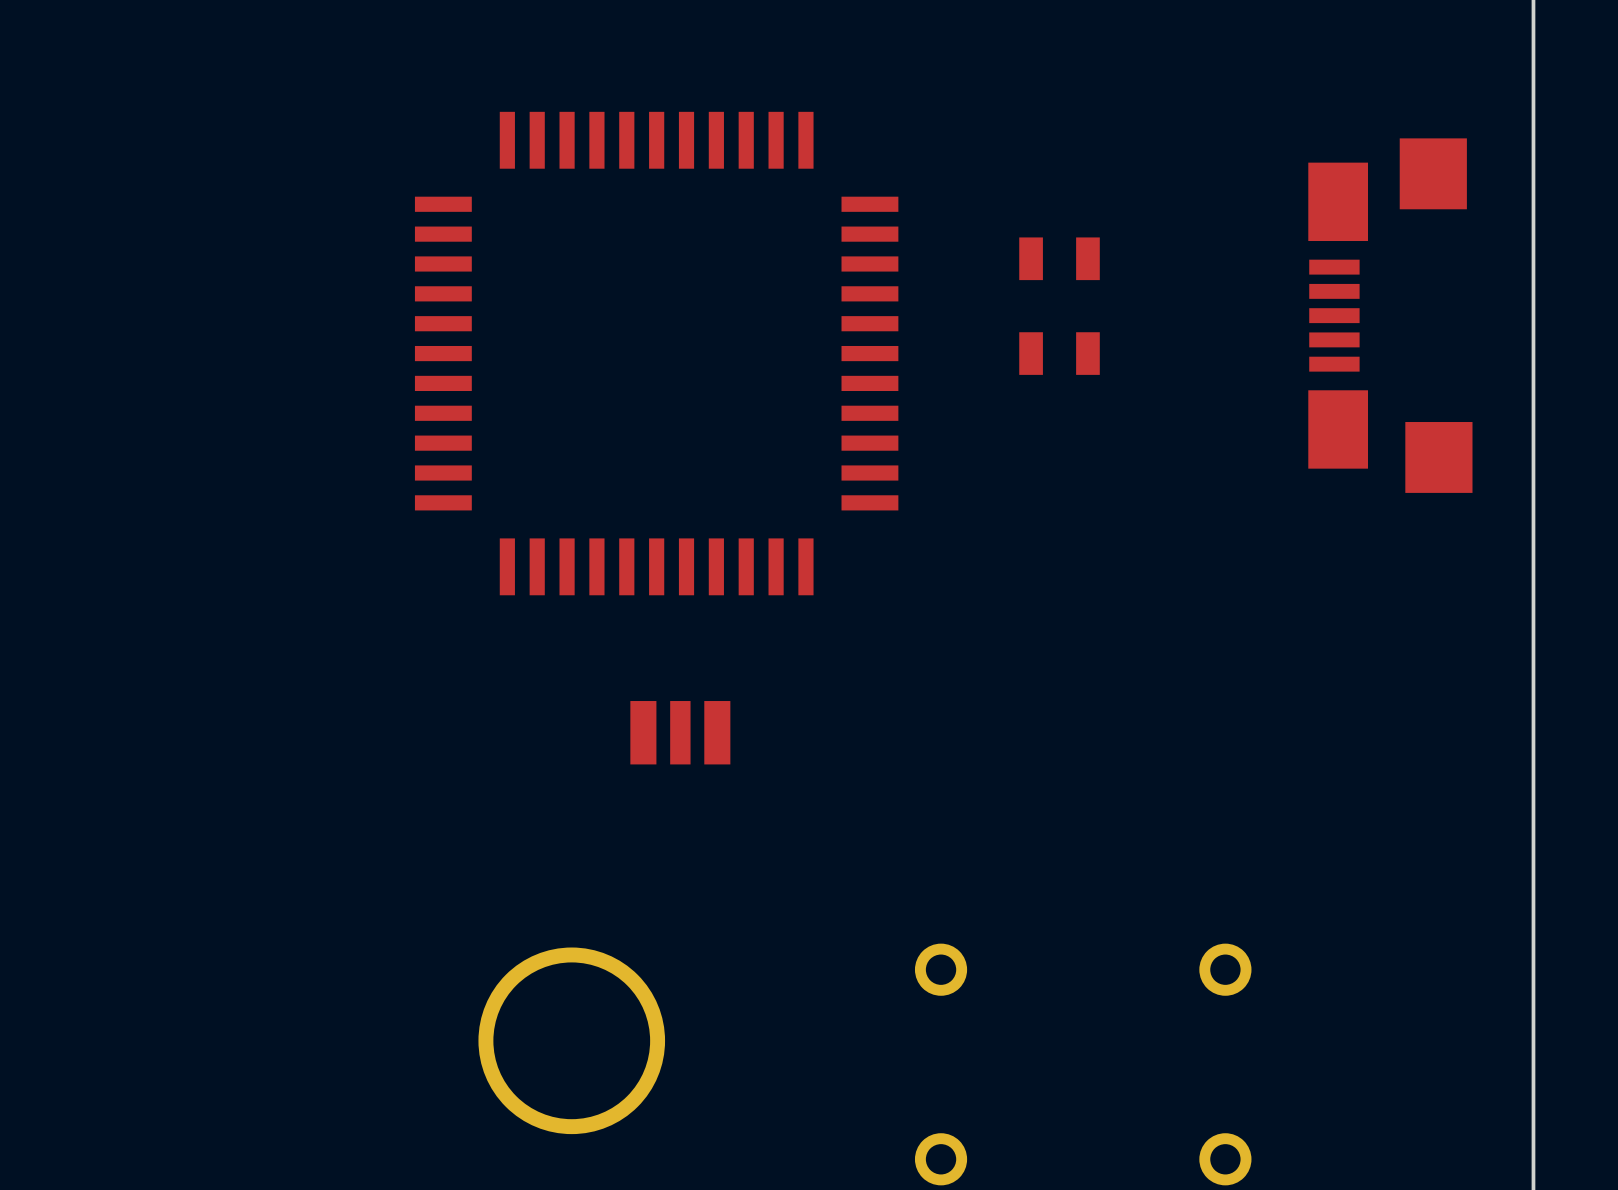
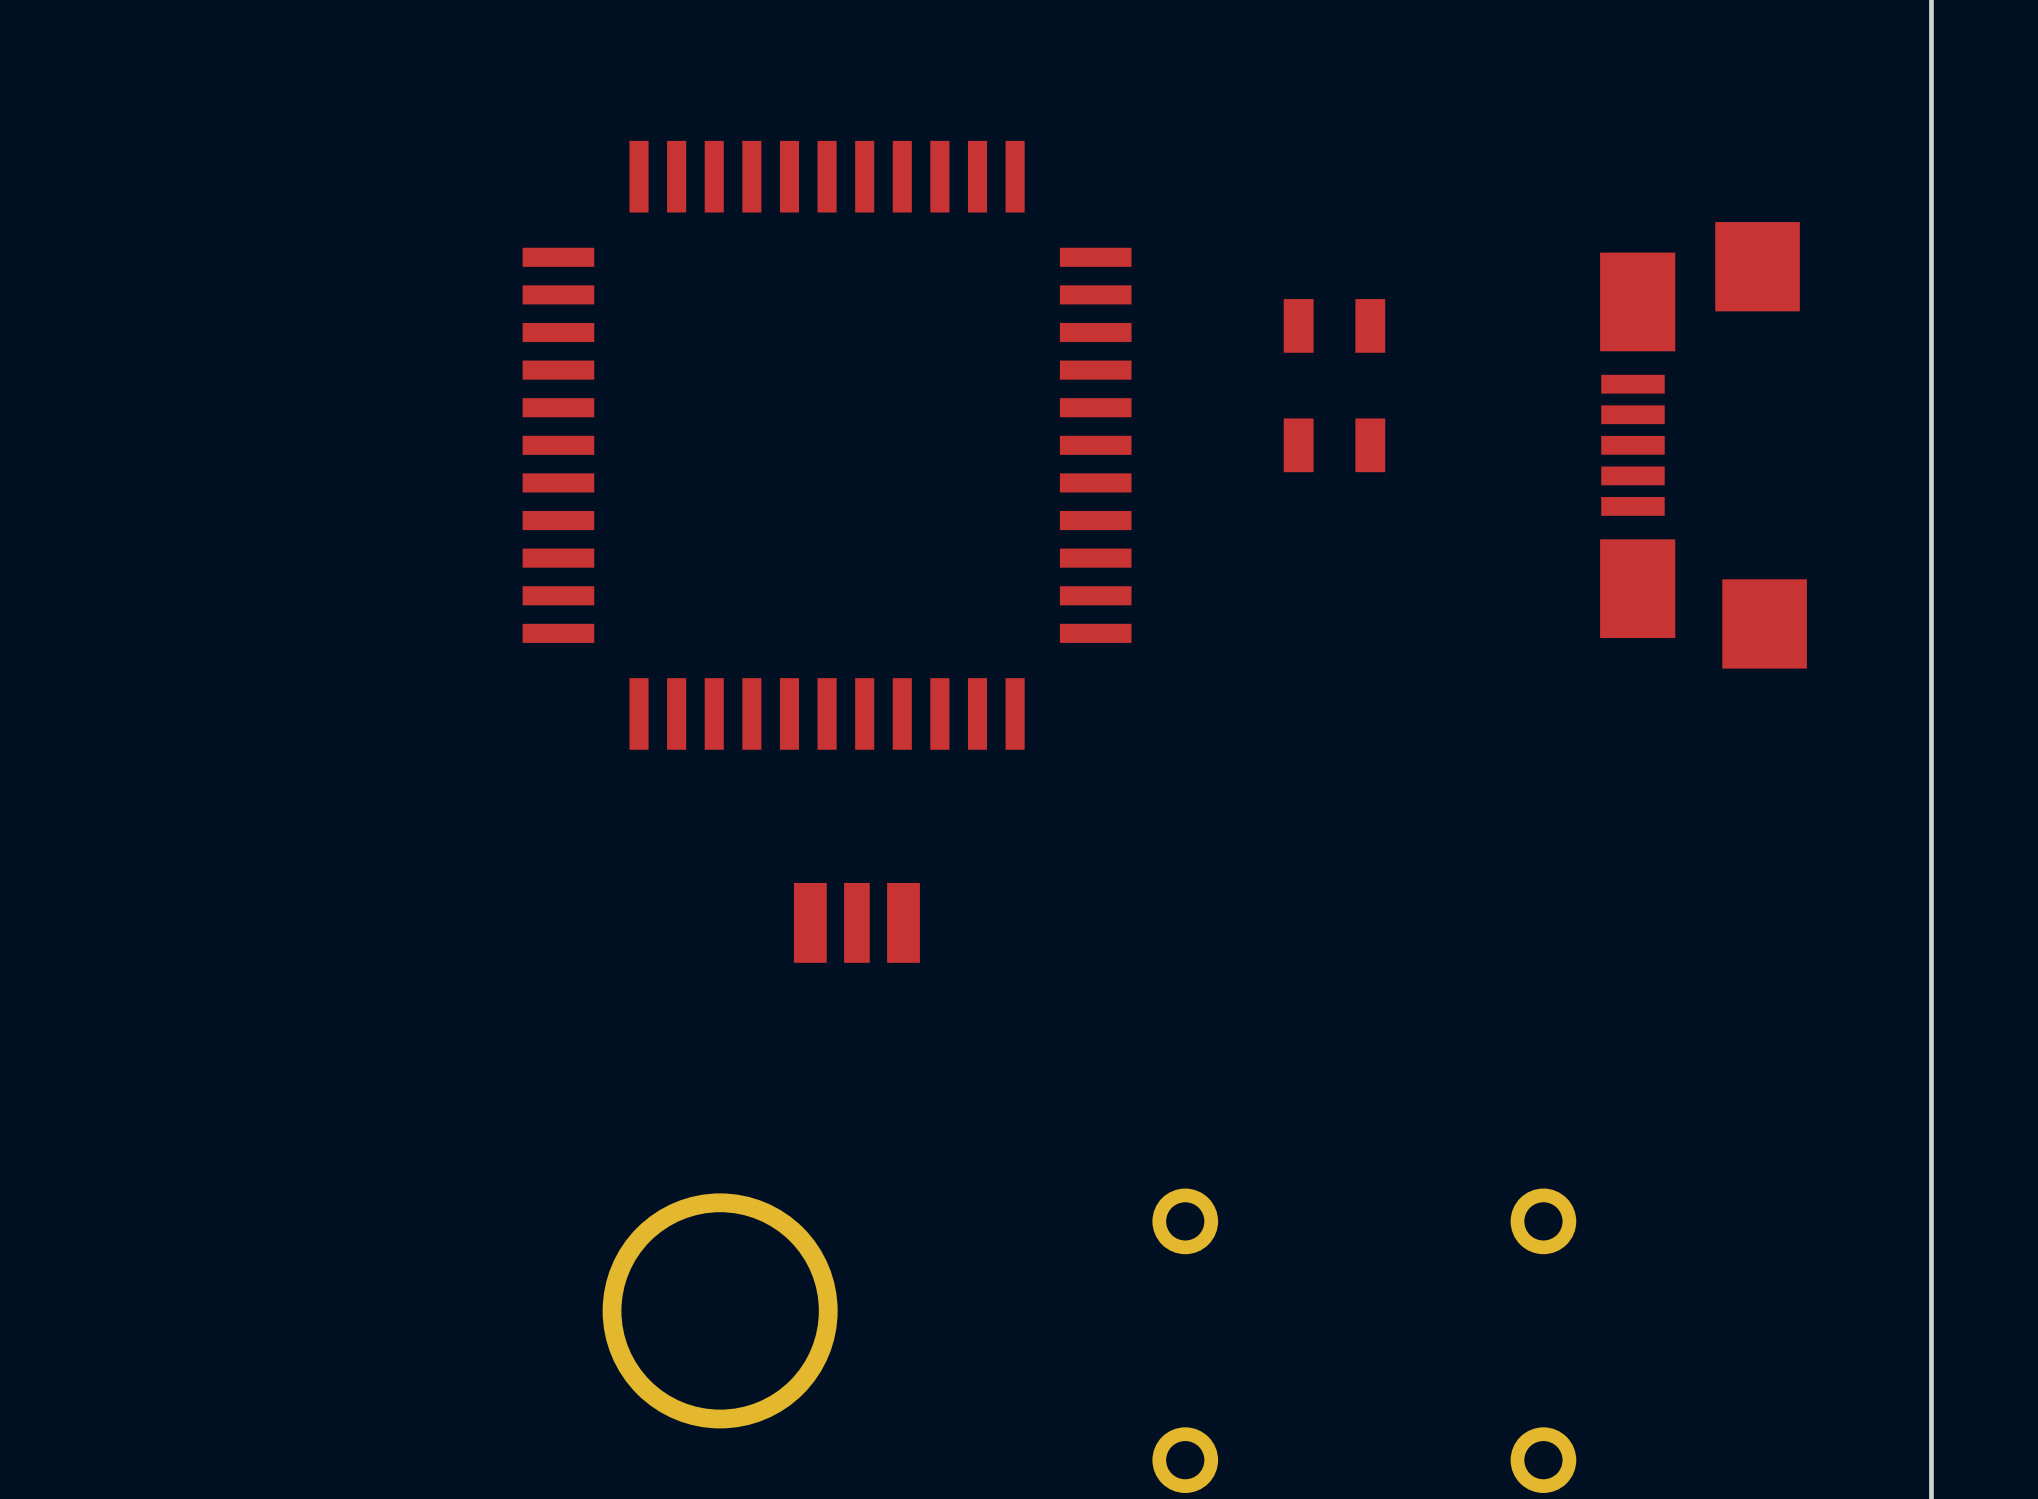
part position: (1390, 315) -> (1703, 445)

